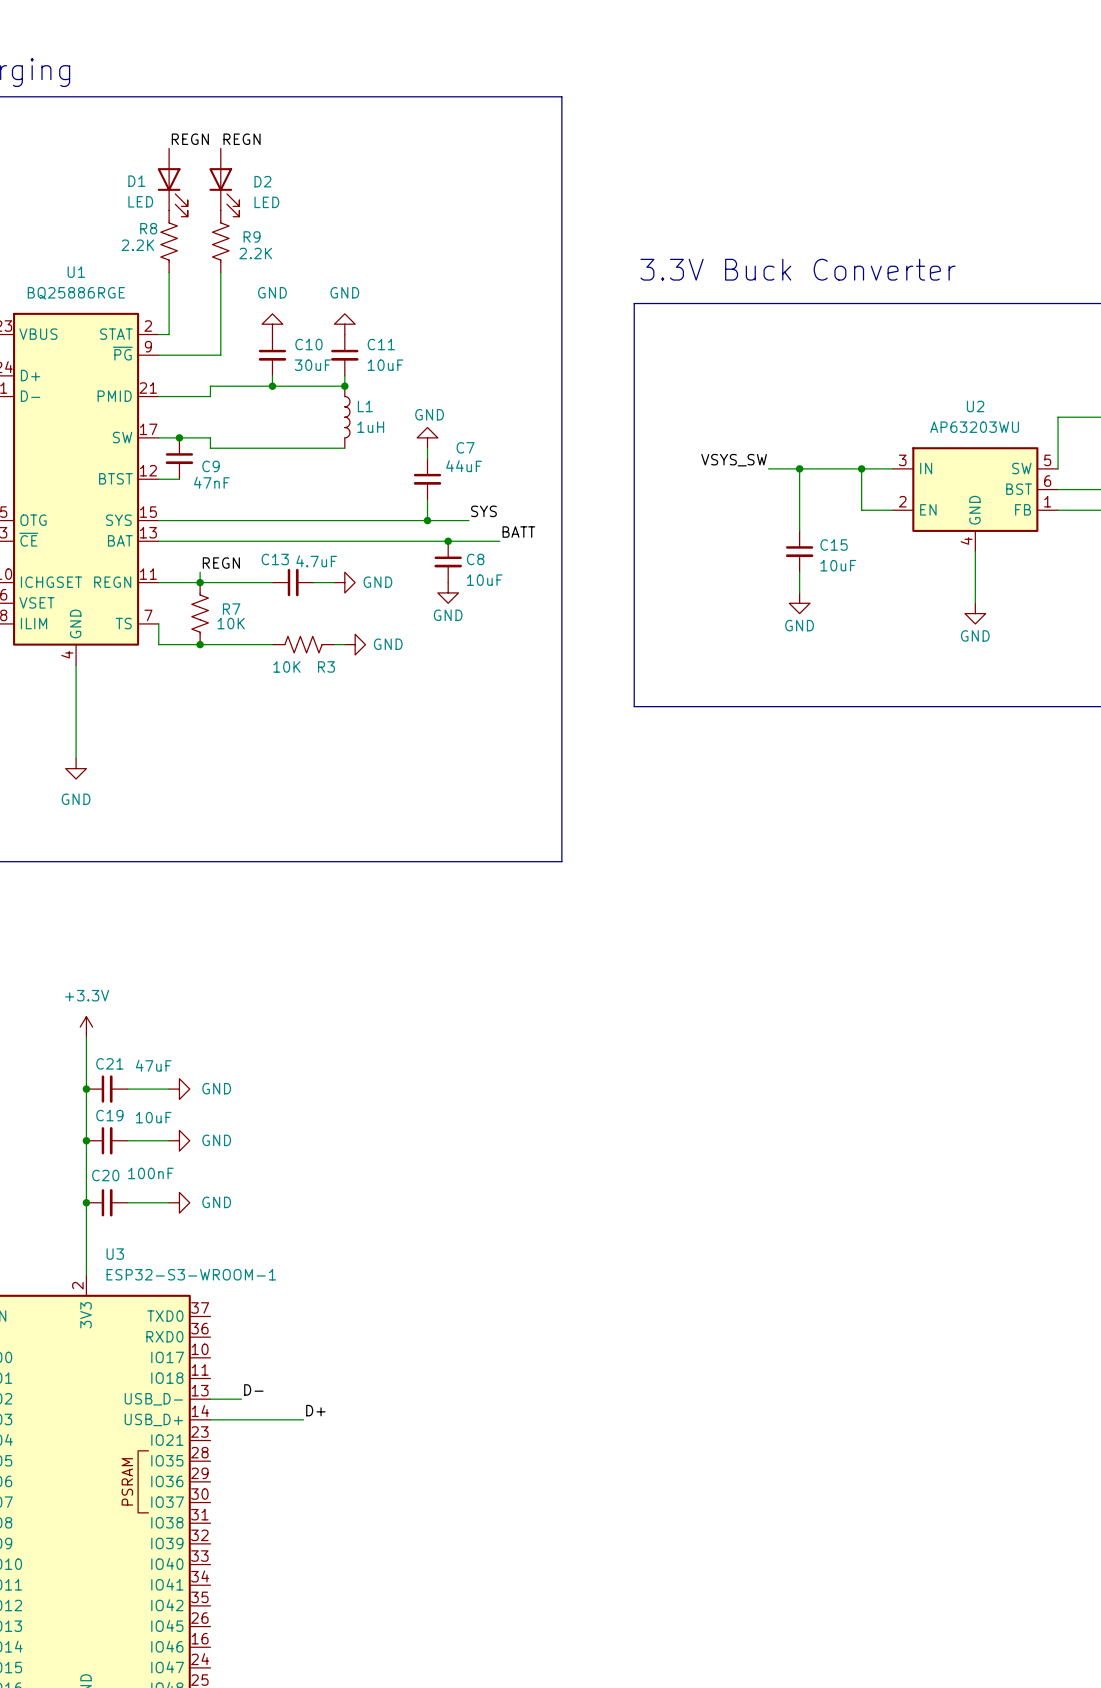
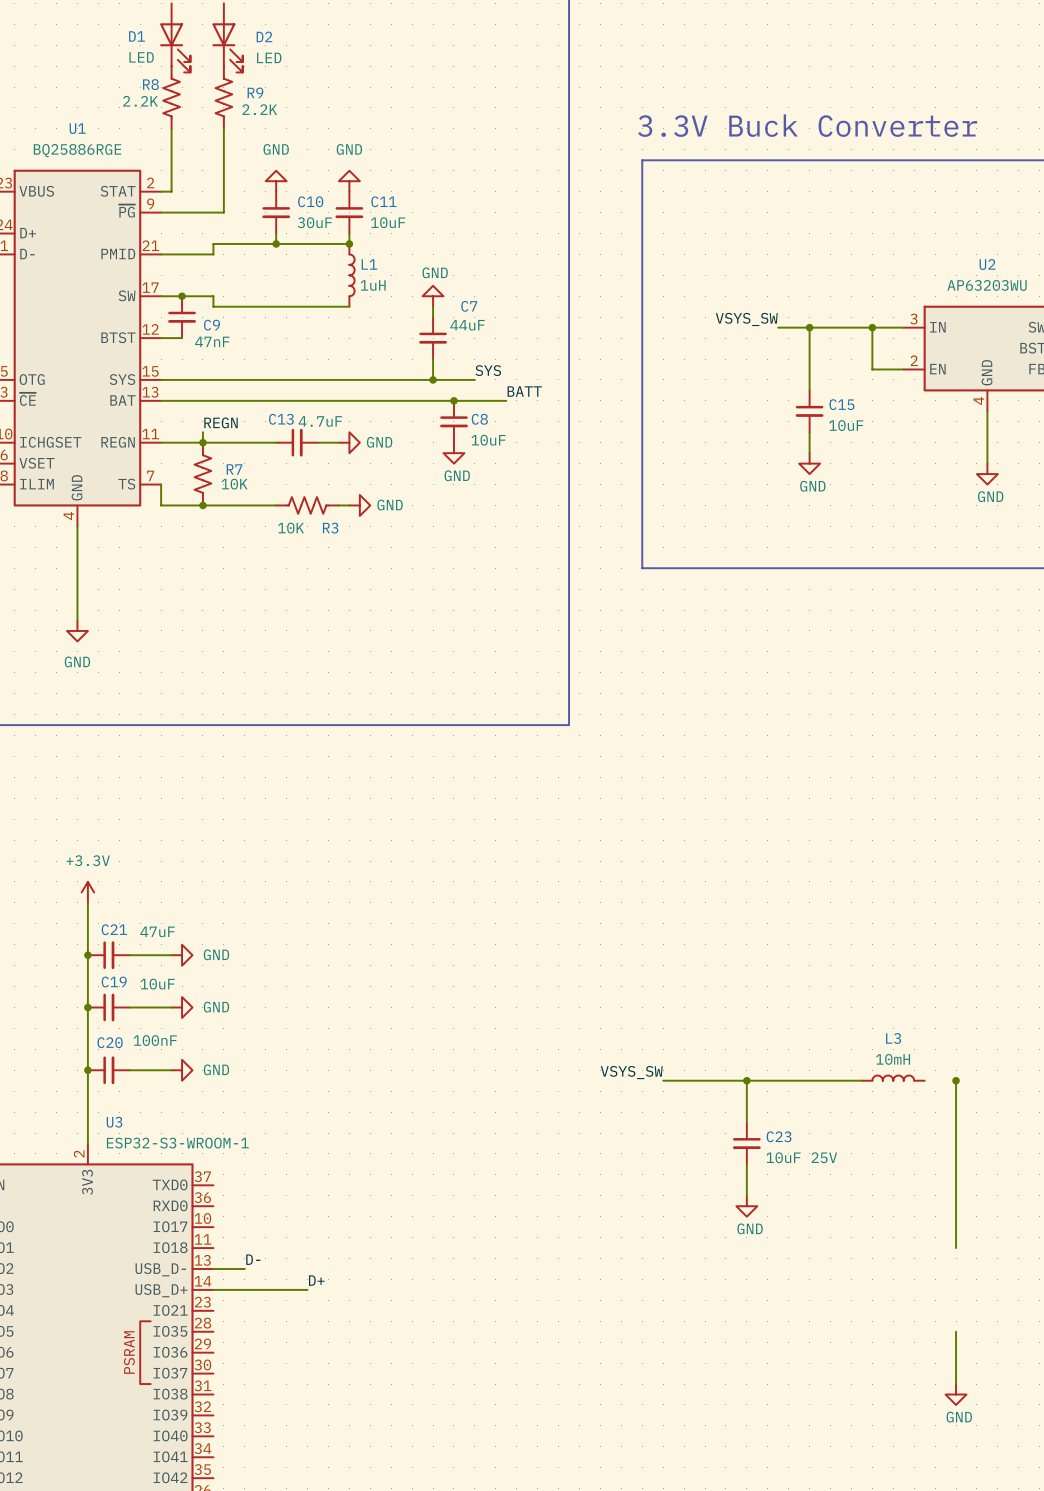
label: none -> VSYS_SW (631, 1072)
L3: none -> 10mH (893, 1078)
wire: none -> (663, 1080) (861, 1080)
wire: none -> (746, 1080) (746, 1122)
junction: none -> (746, 1080)
wire: none -> (956, 1080) (956, 1248)
junction: none -> (956, 1080)
C23: none -> 10uF 25V (746, 1143)
wire: none -> (746, 1164) (746, 1195)
power symbol: none -> GND (746, 1206)
wire: none -> (956, 1331) (956, 1384)
power symbol: none -> GND (956, 1394)

